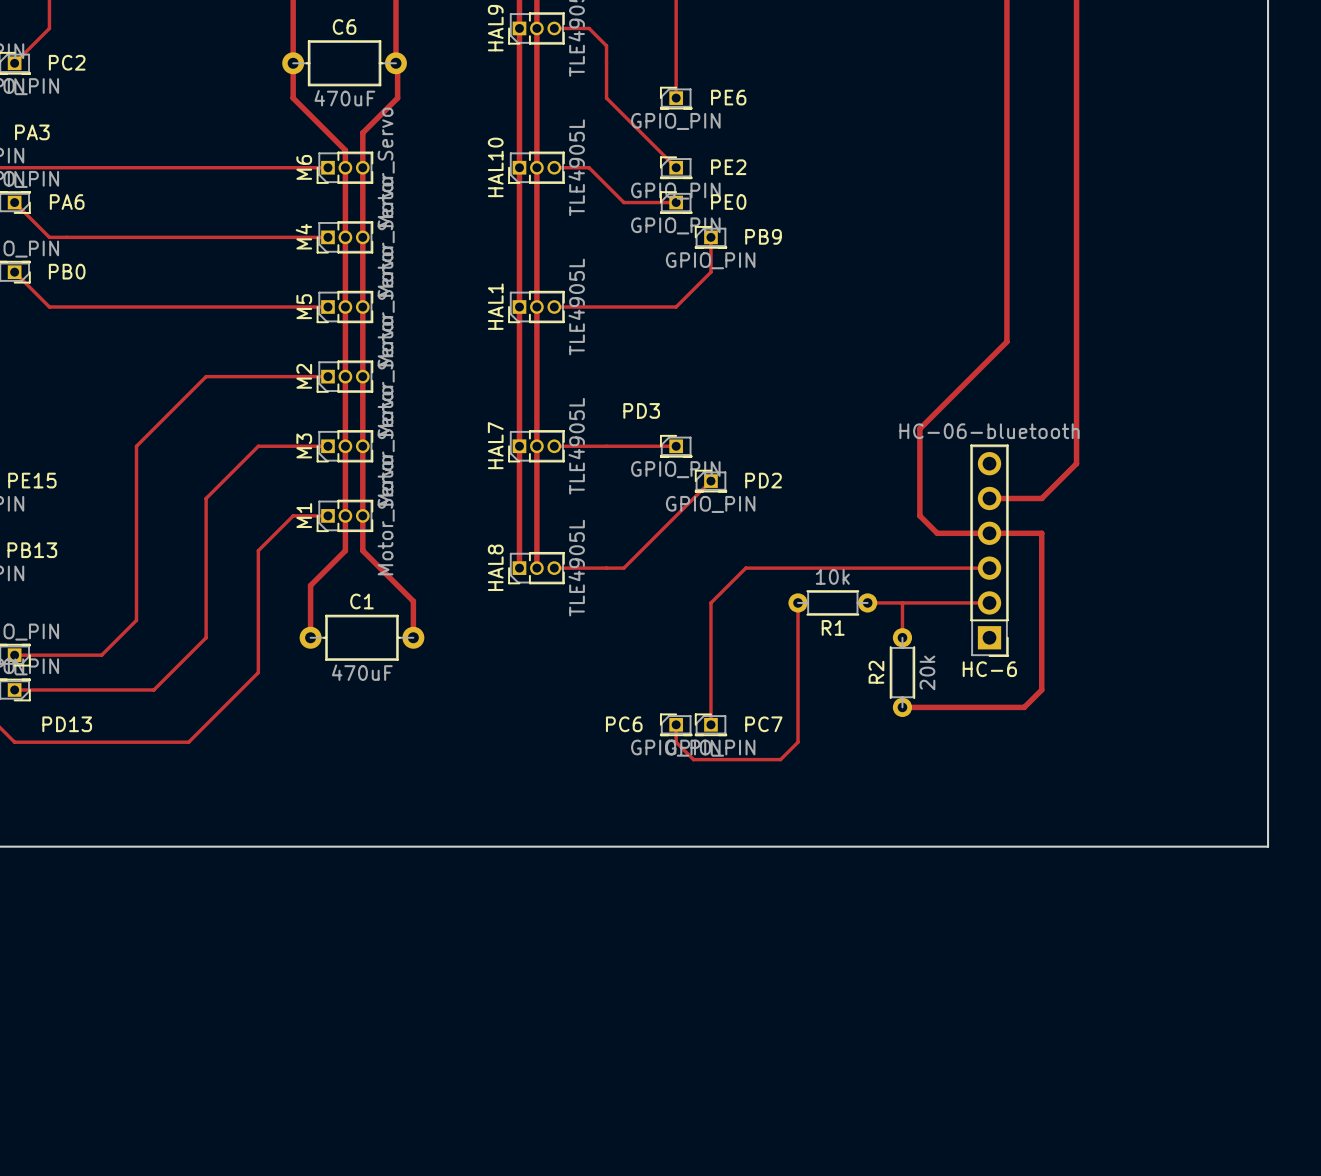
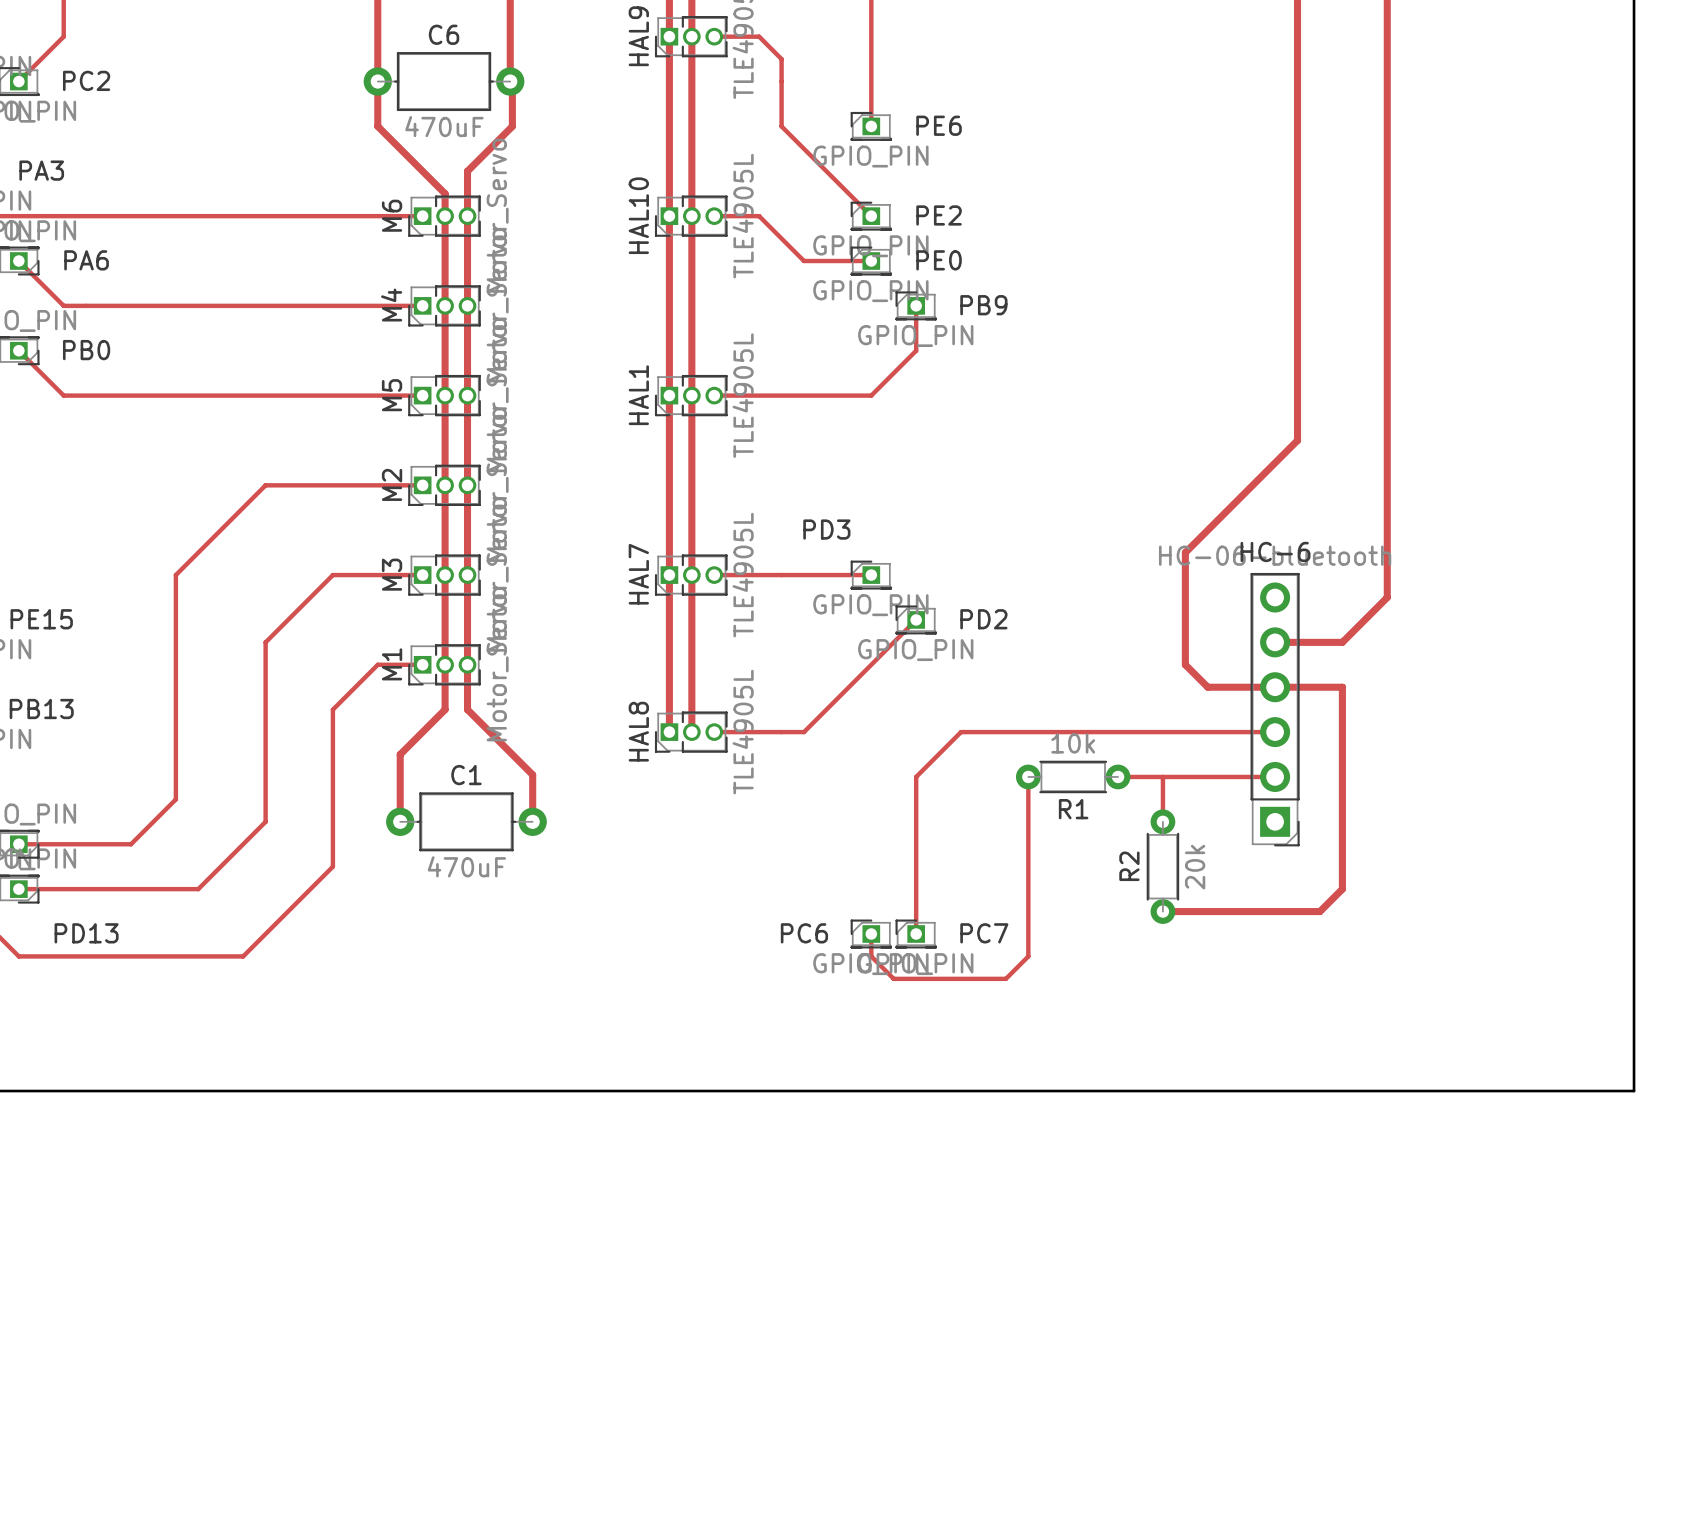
HC-6 footprint: [970, 444, 1009, 657] -> [1250, 572, 1300, 847]
HC-6 name position: HC-6 (989, 669) -> HC-6 (1275, 551)

